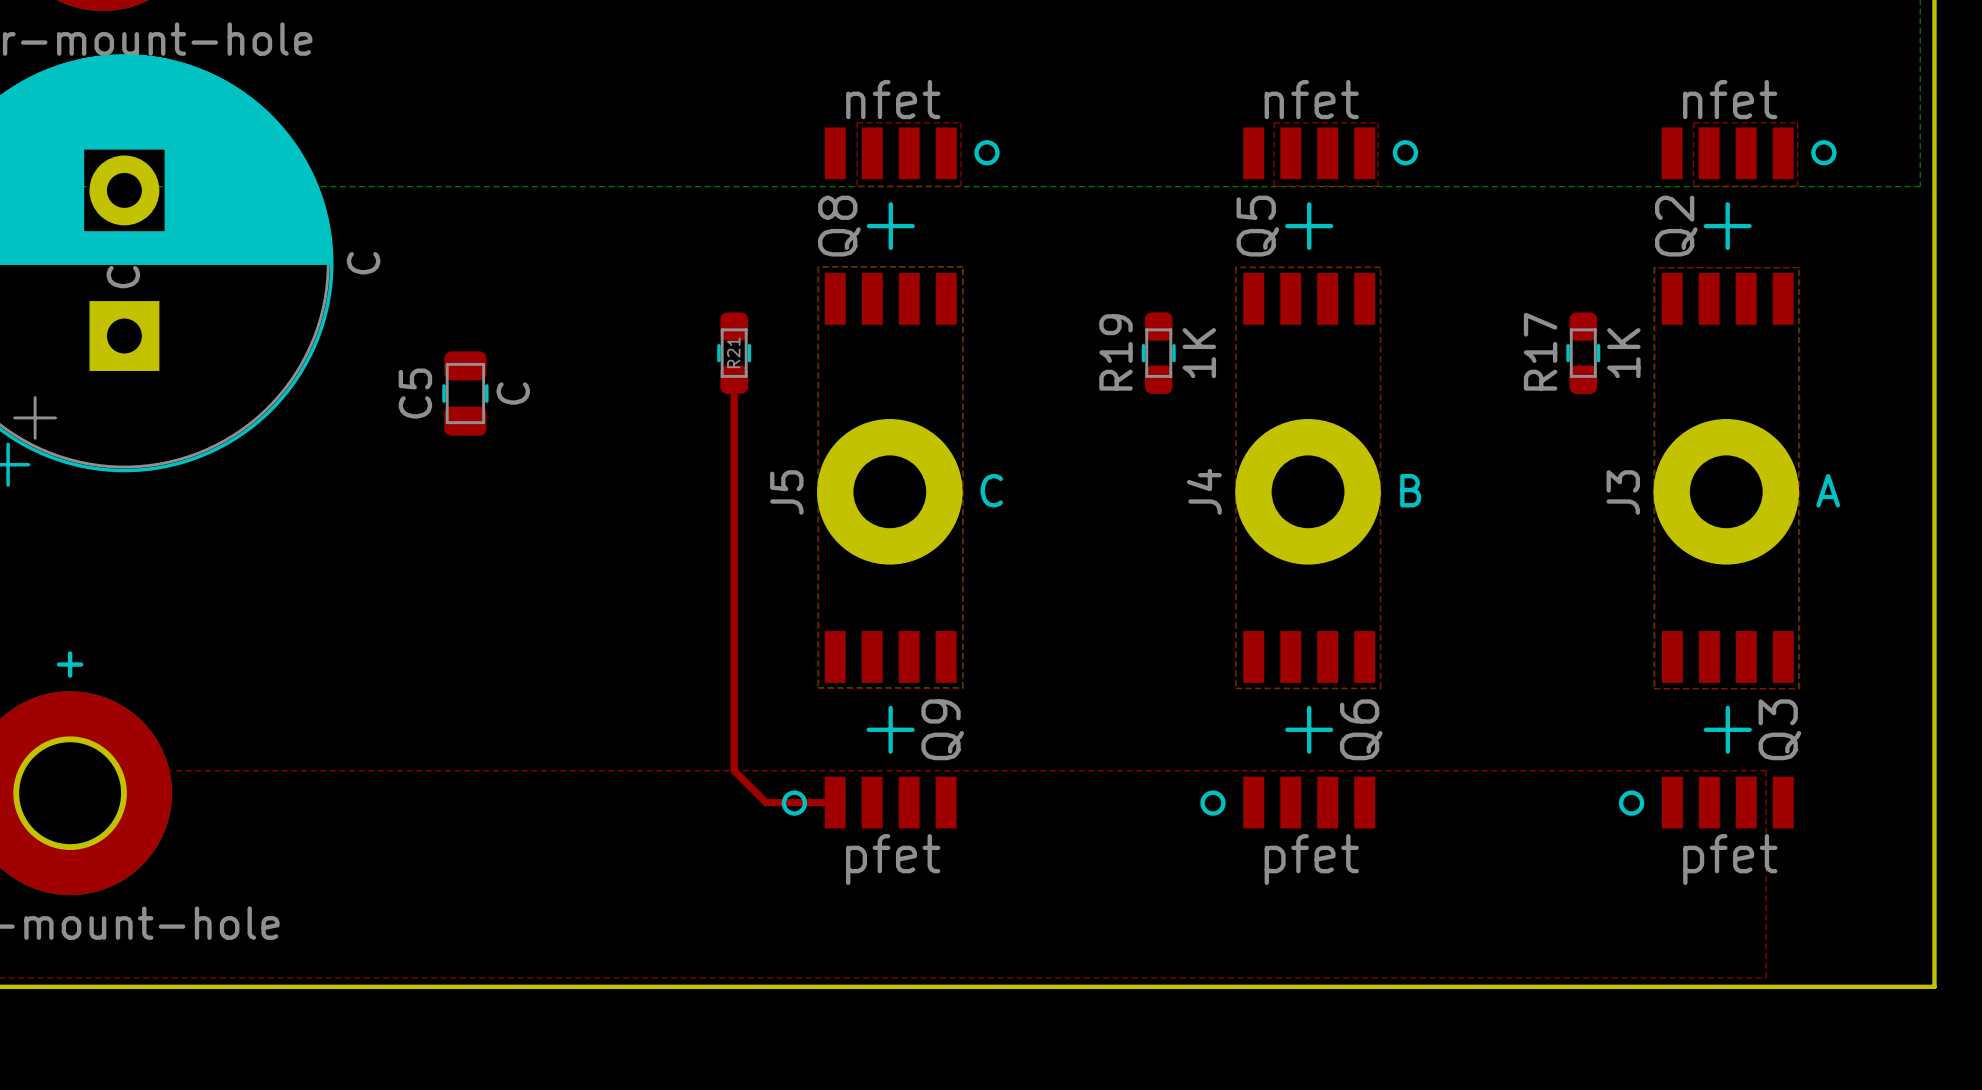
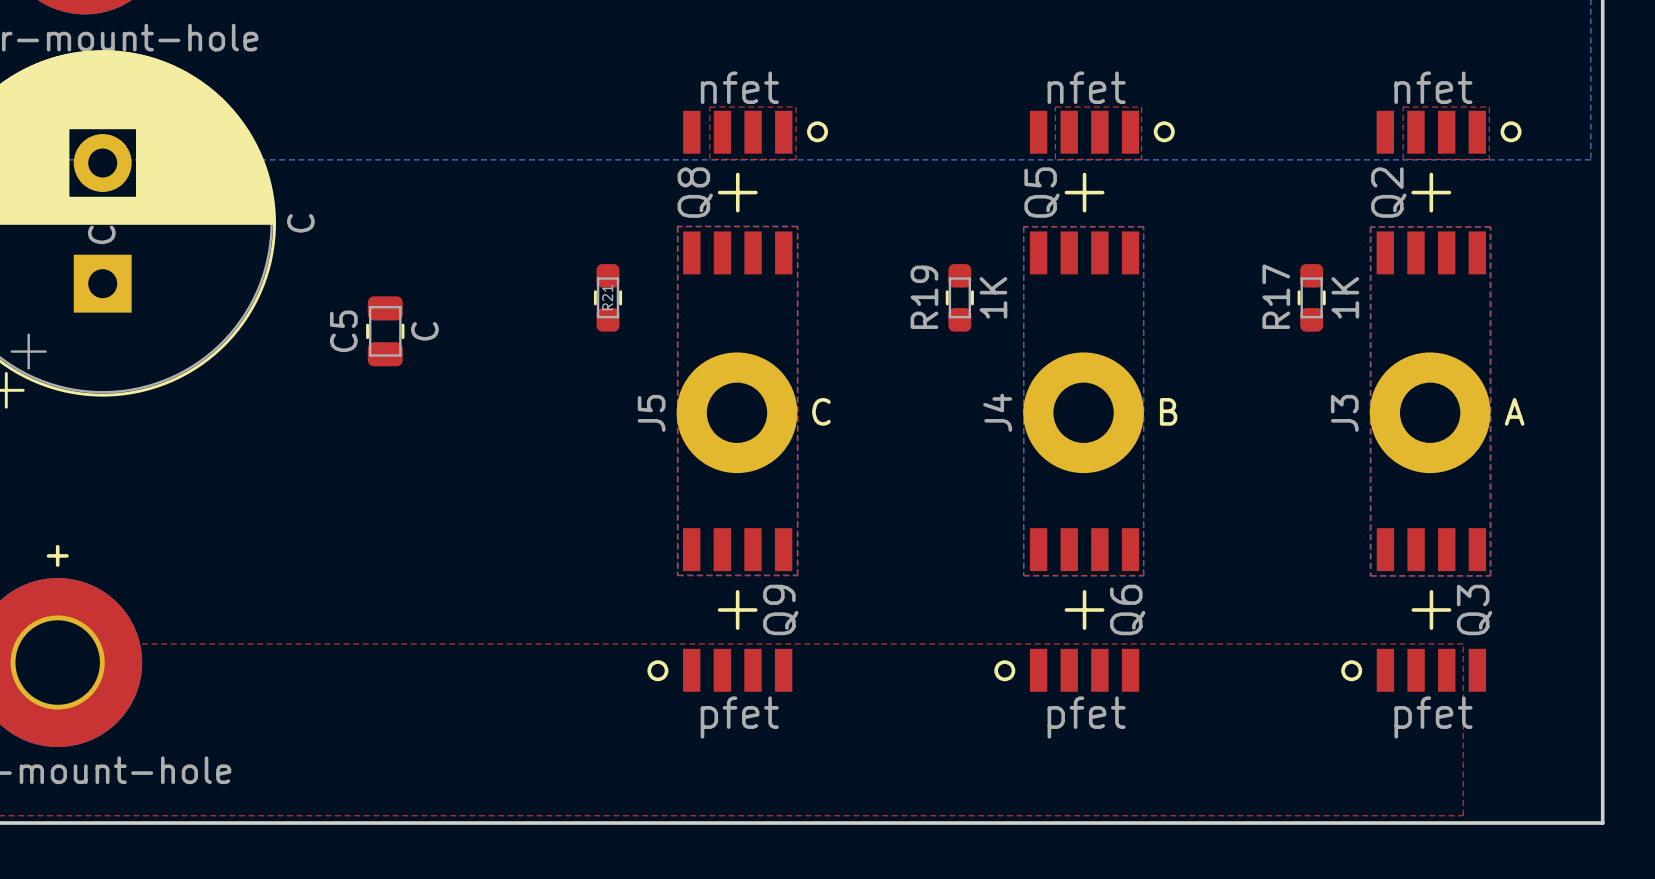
top track: (734, 379) (734, 770) (765, 802) (835, 802) -> none

